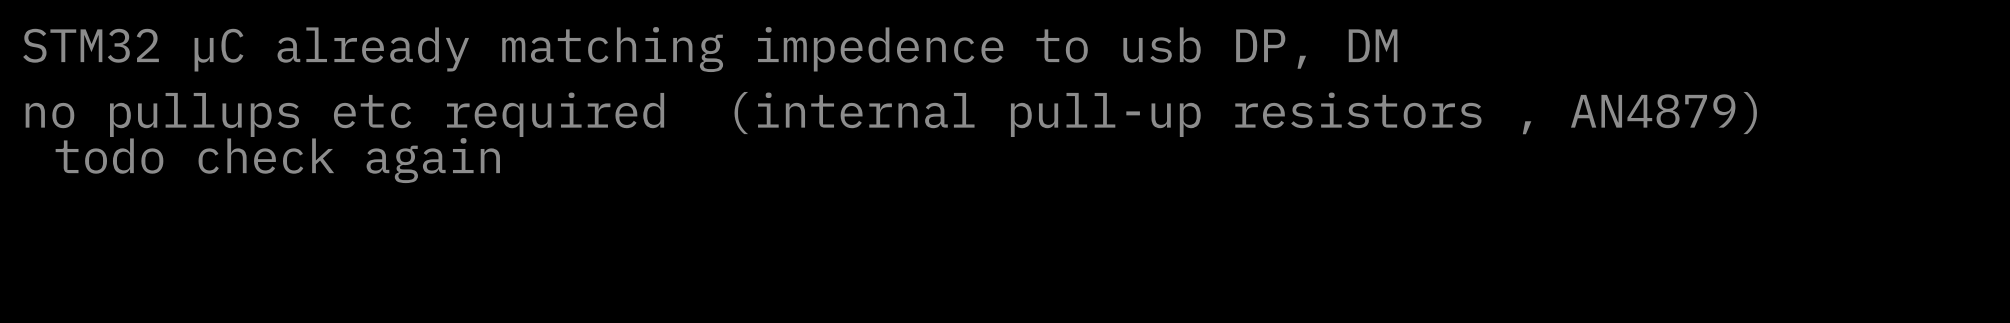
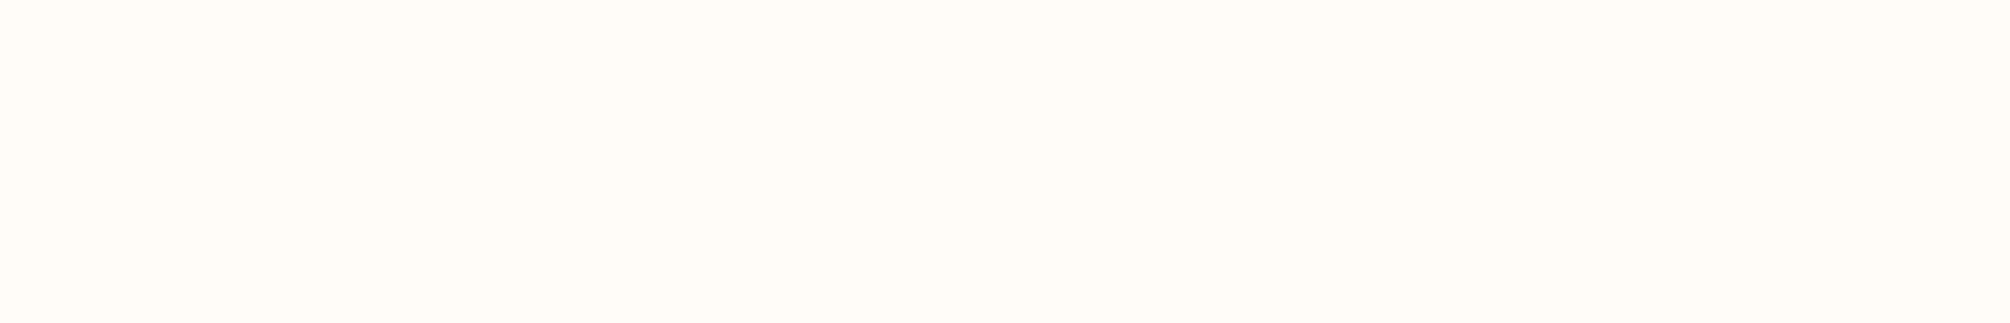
text: STM32 µC already matching impedence to usb DP, DM (710, 49) -> none
text: no pullups etc required (internal pull-up resistors , AN4879) (891, 114) -> none
text: todo check again (277, 160) -> none

